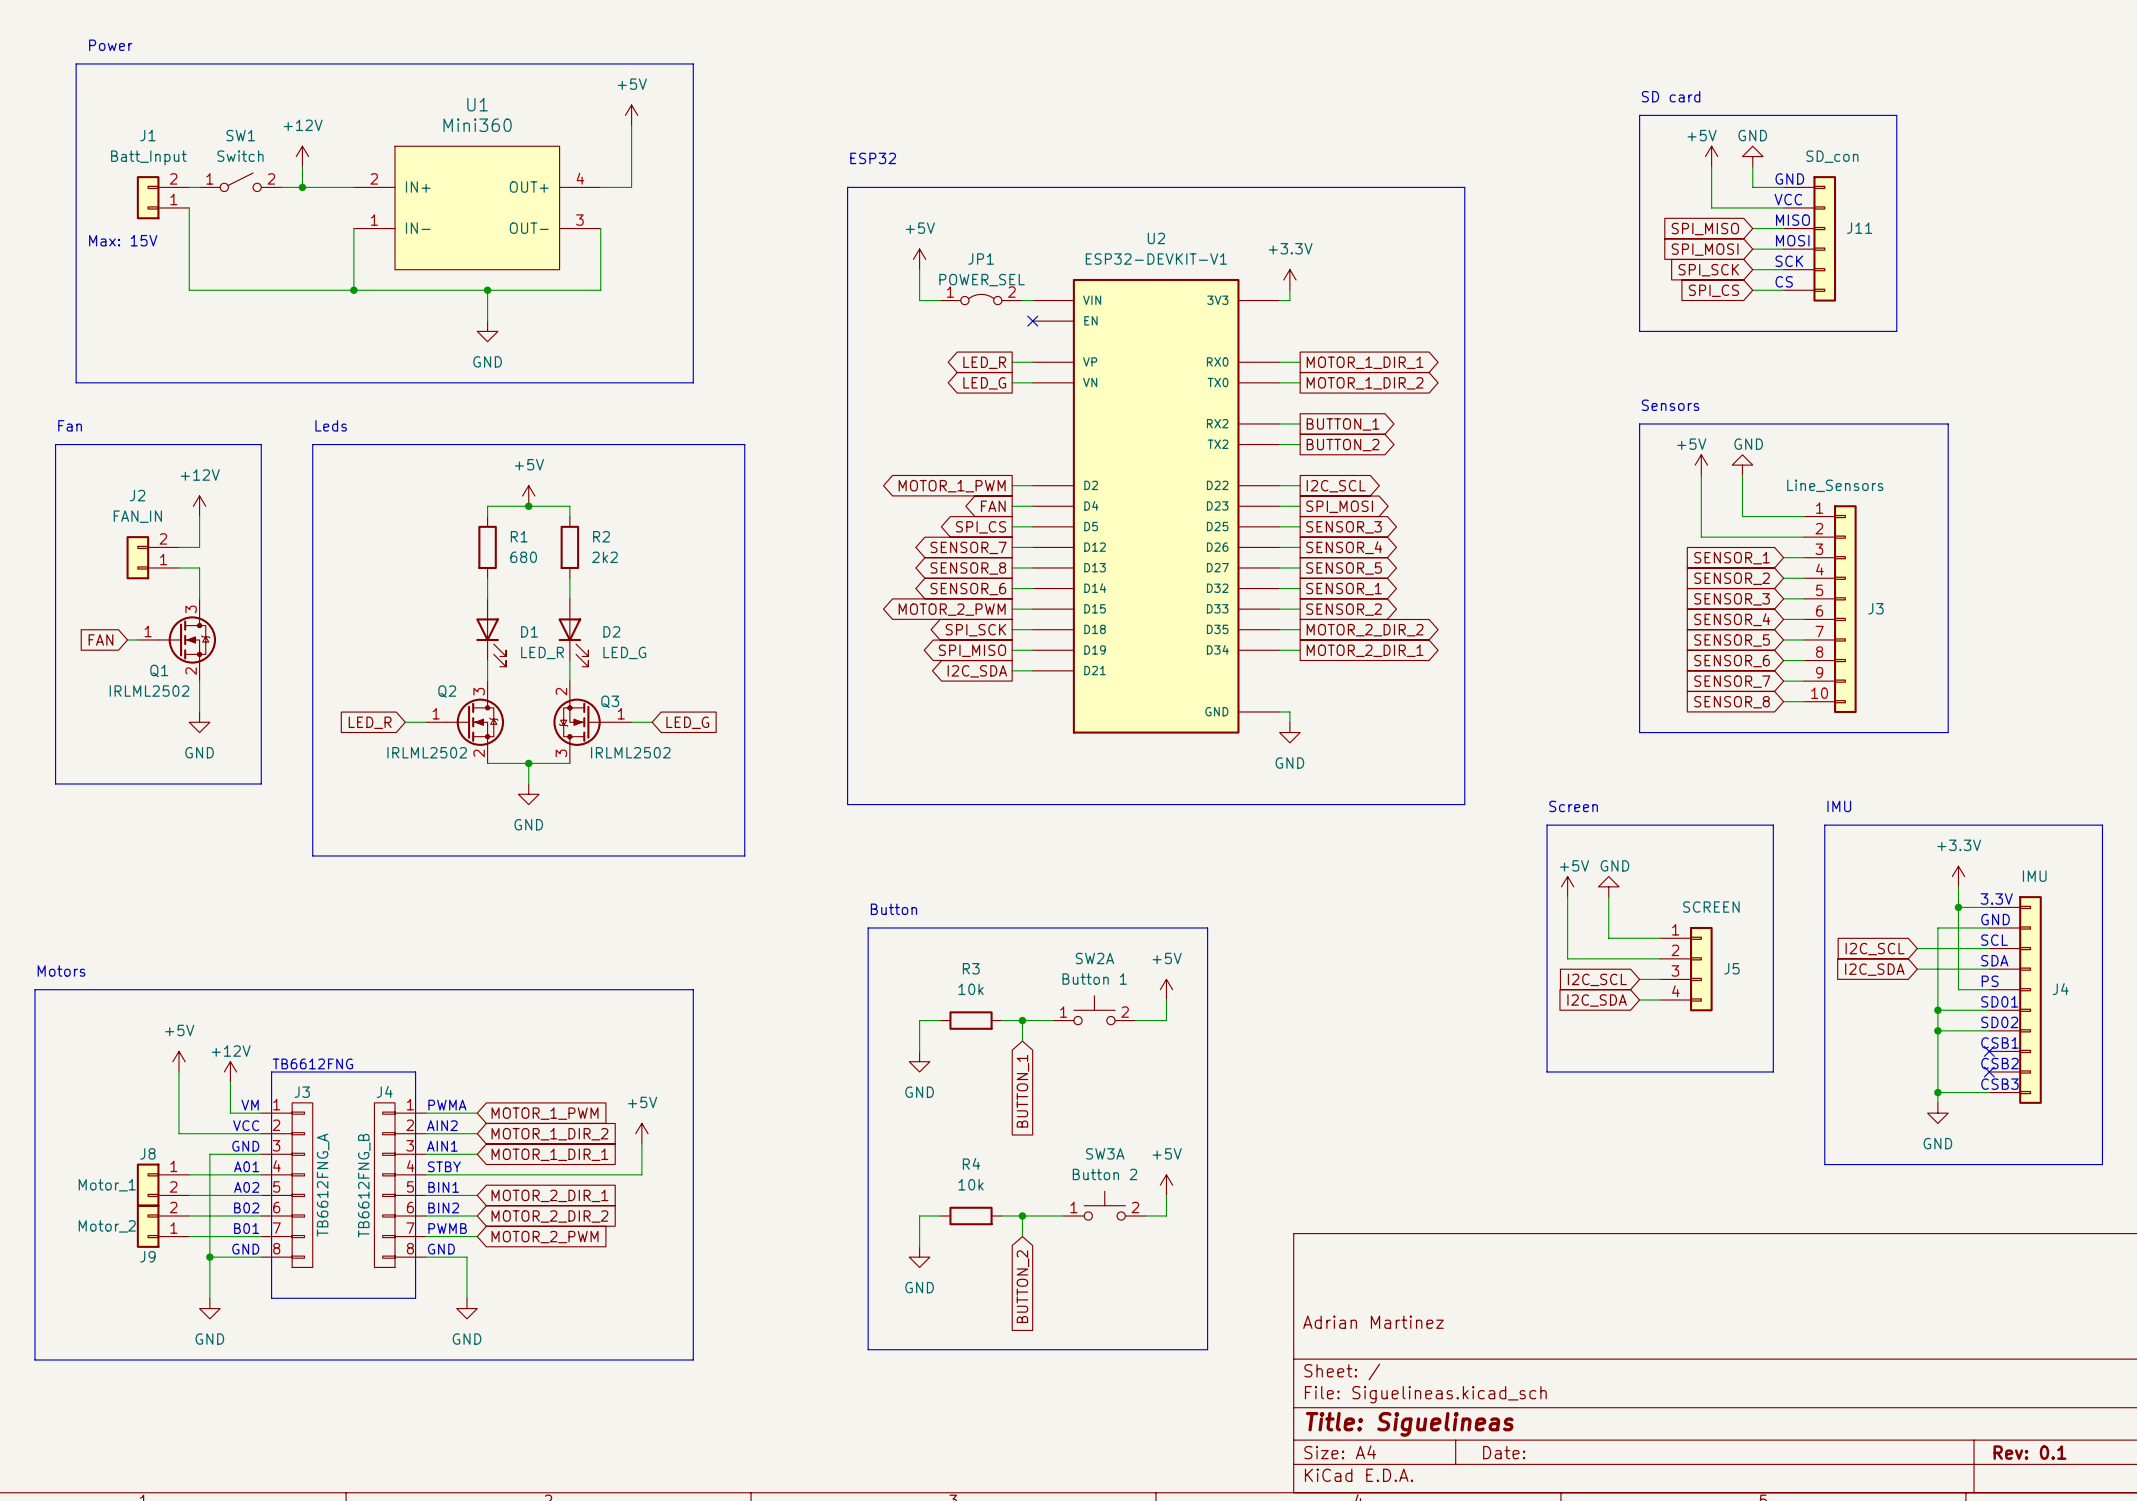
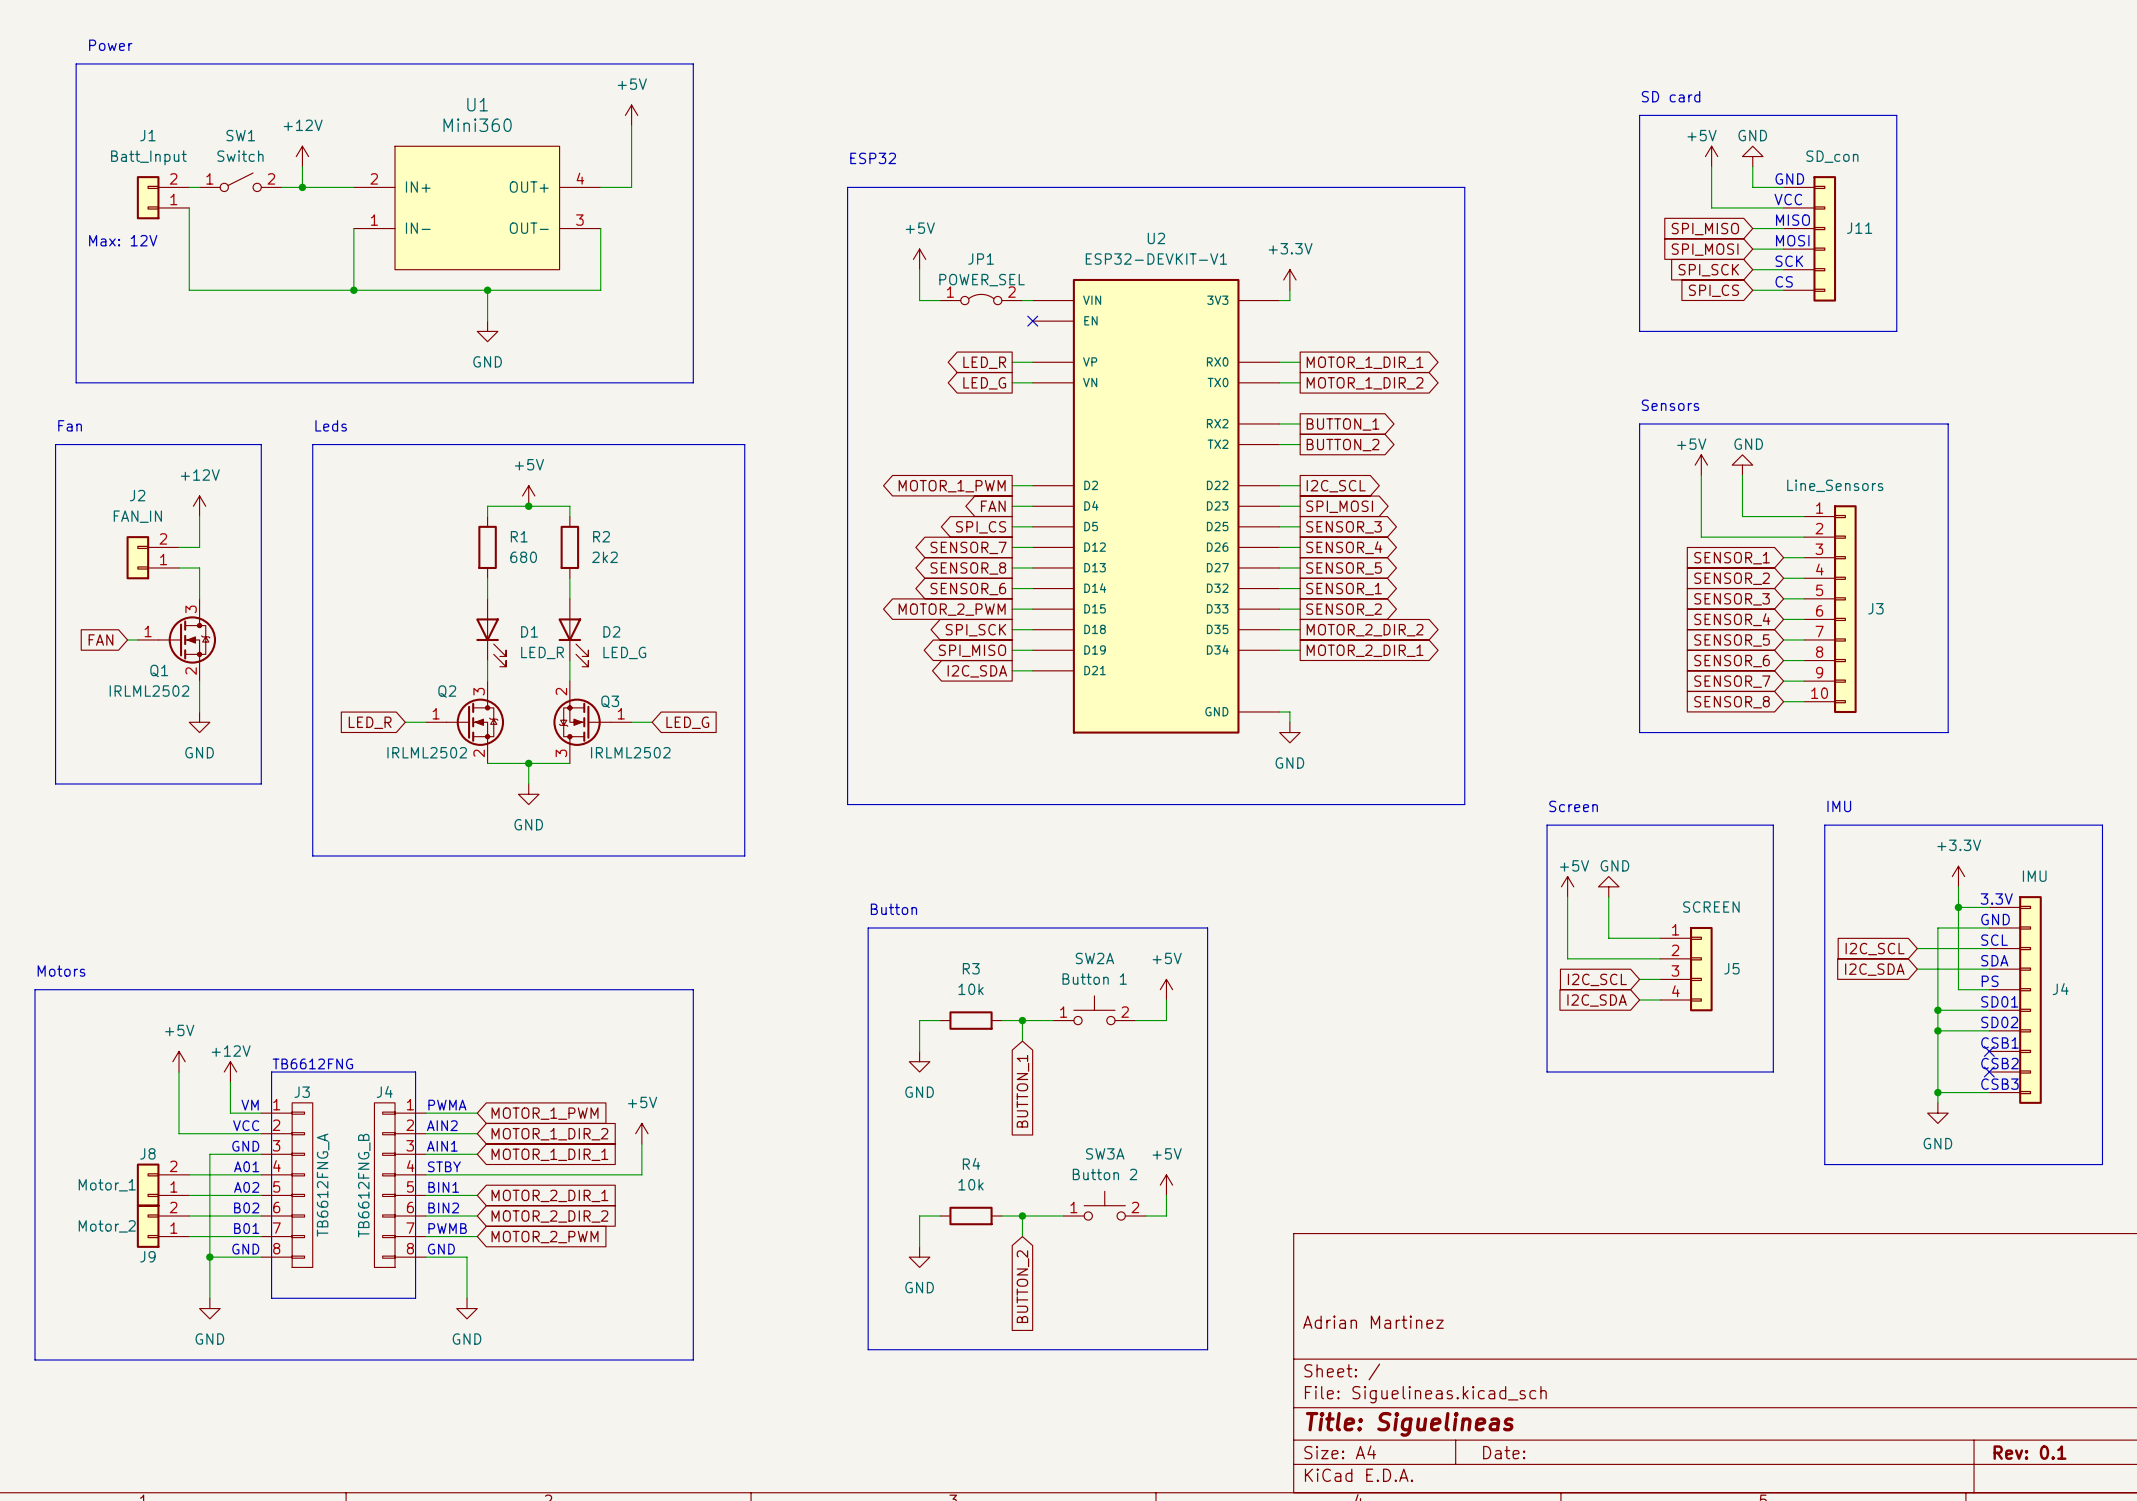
text: Max: 15V (123, 240) -> Max: 12V (123, 240)
J8 flip: as is (148, 1185) -> up-down (148, 1185)

